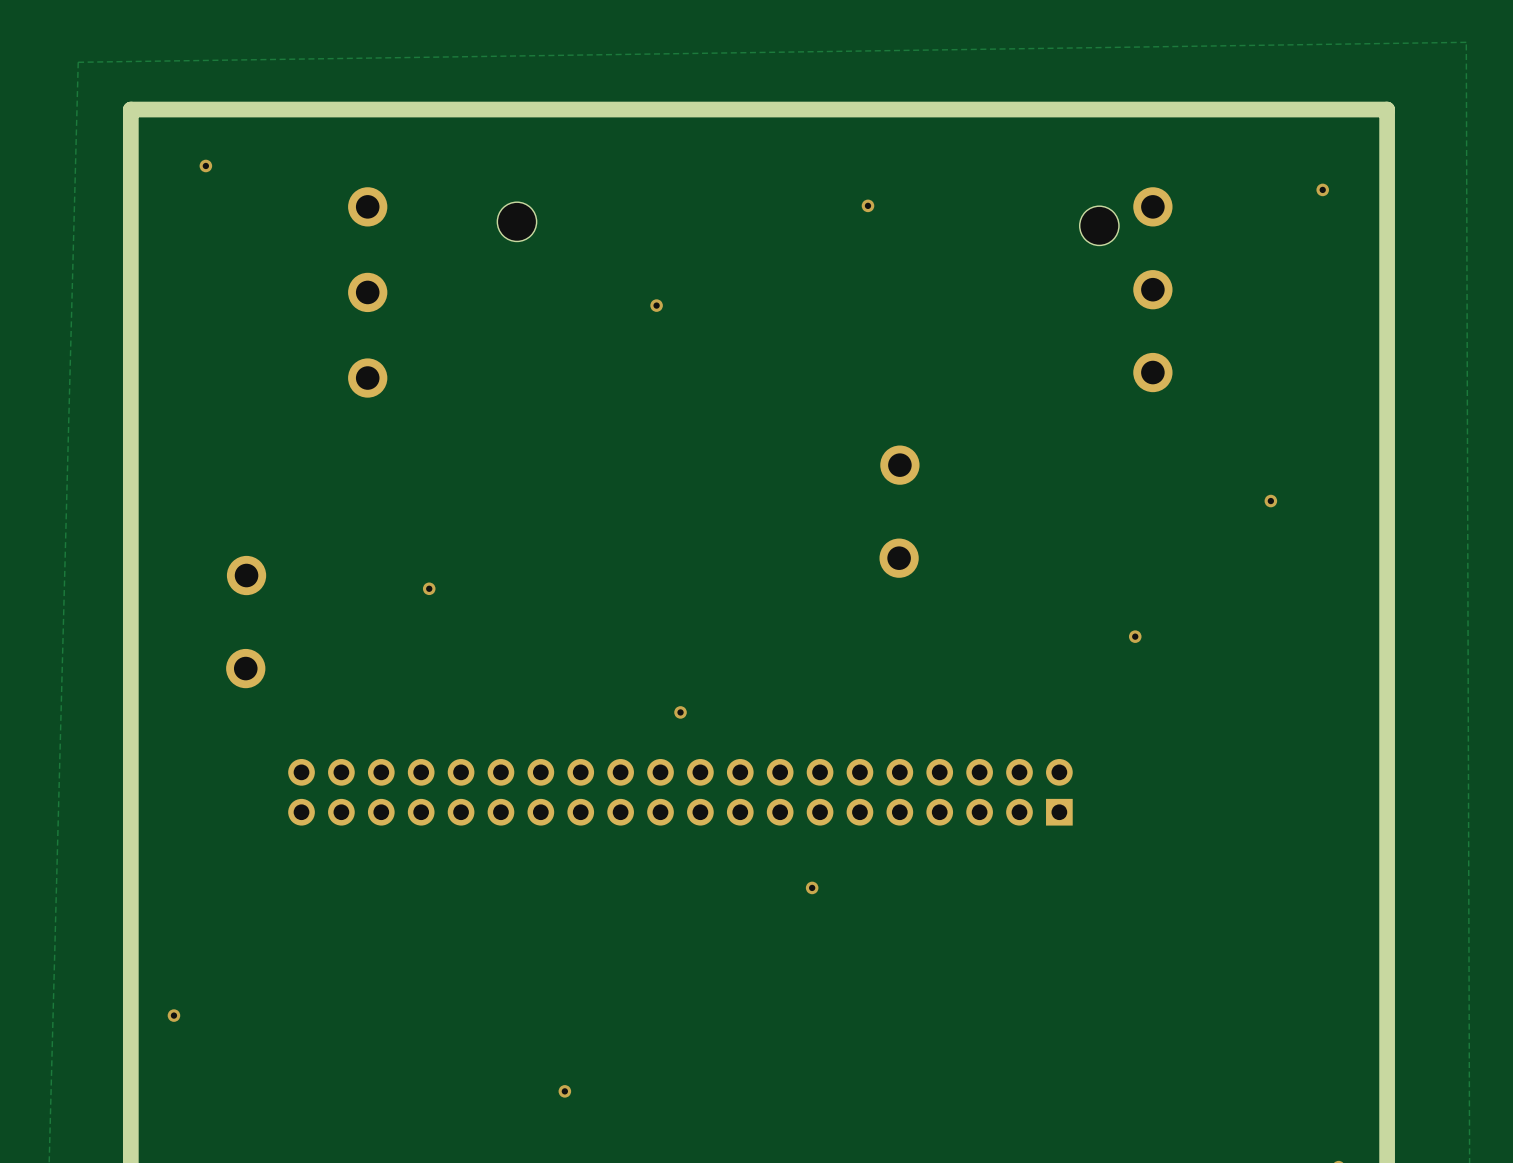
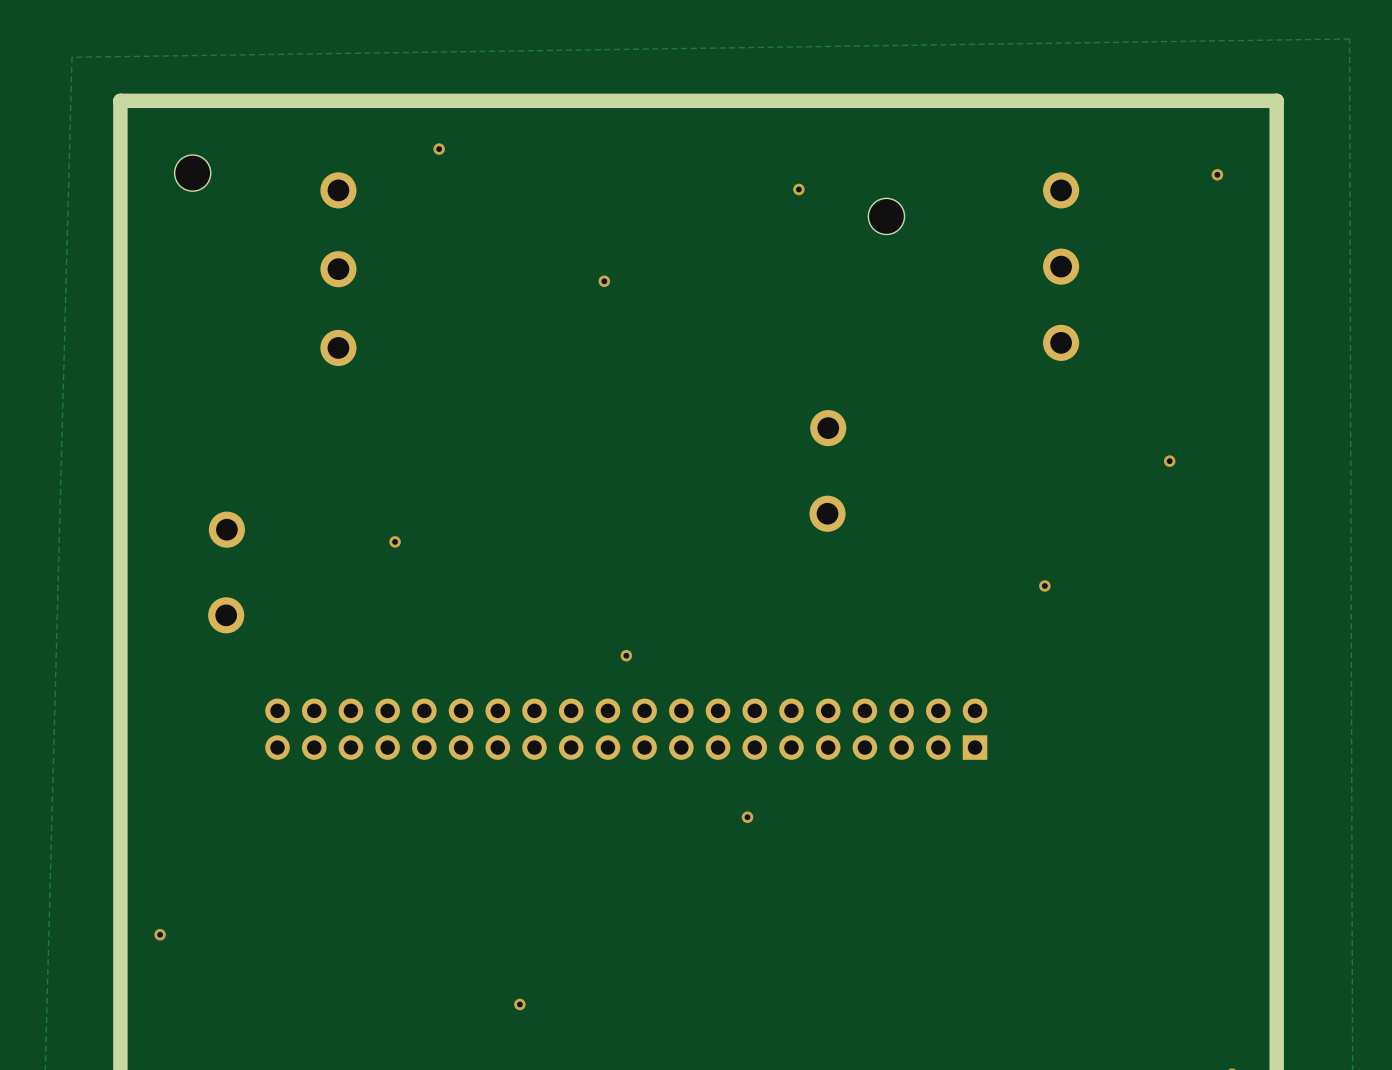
via: none -> (439, 149)
via: (205, 165) -> none
part: none -> (192, 173)
part: (516, 221) -> none
part position: (1099, 225) -> (886, 216)

